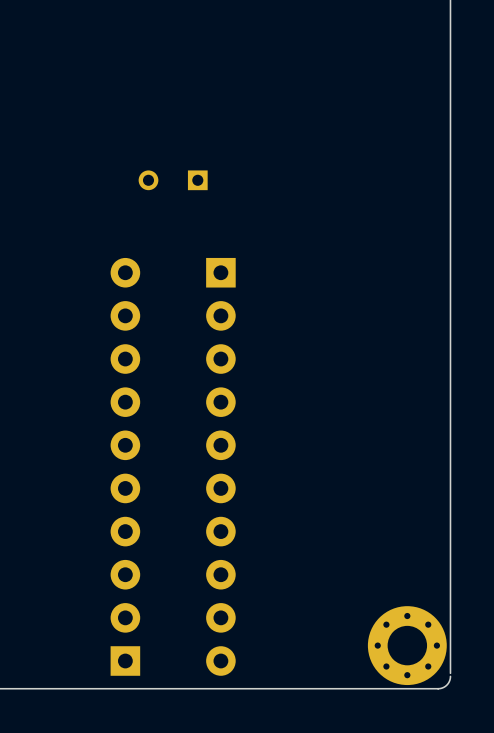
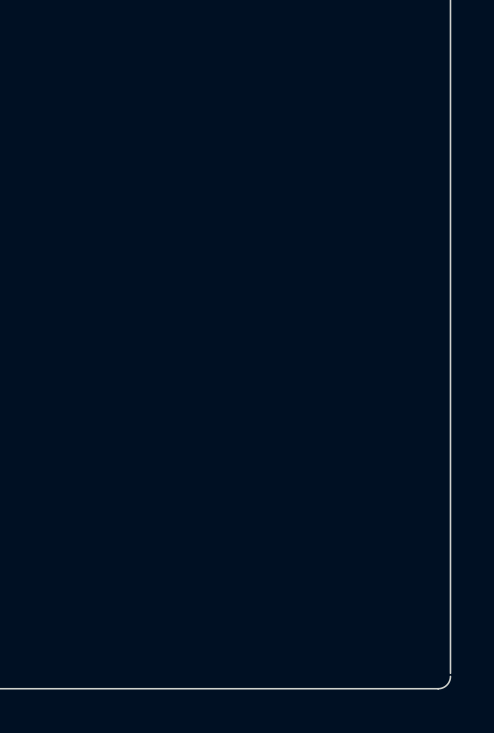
part: (173, 180) -> none
part: (125, 466) -> none
part: (220, 466) -> none
part: (407, 645) -> none

